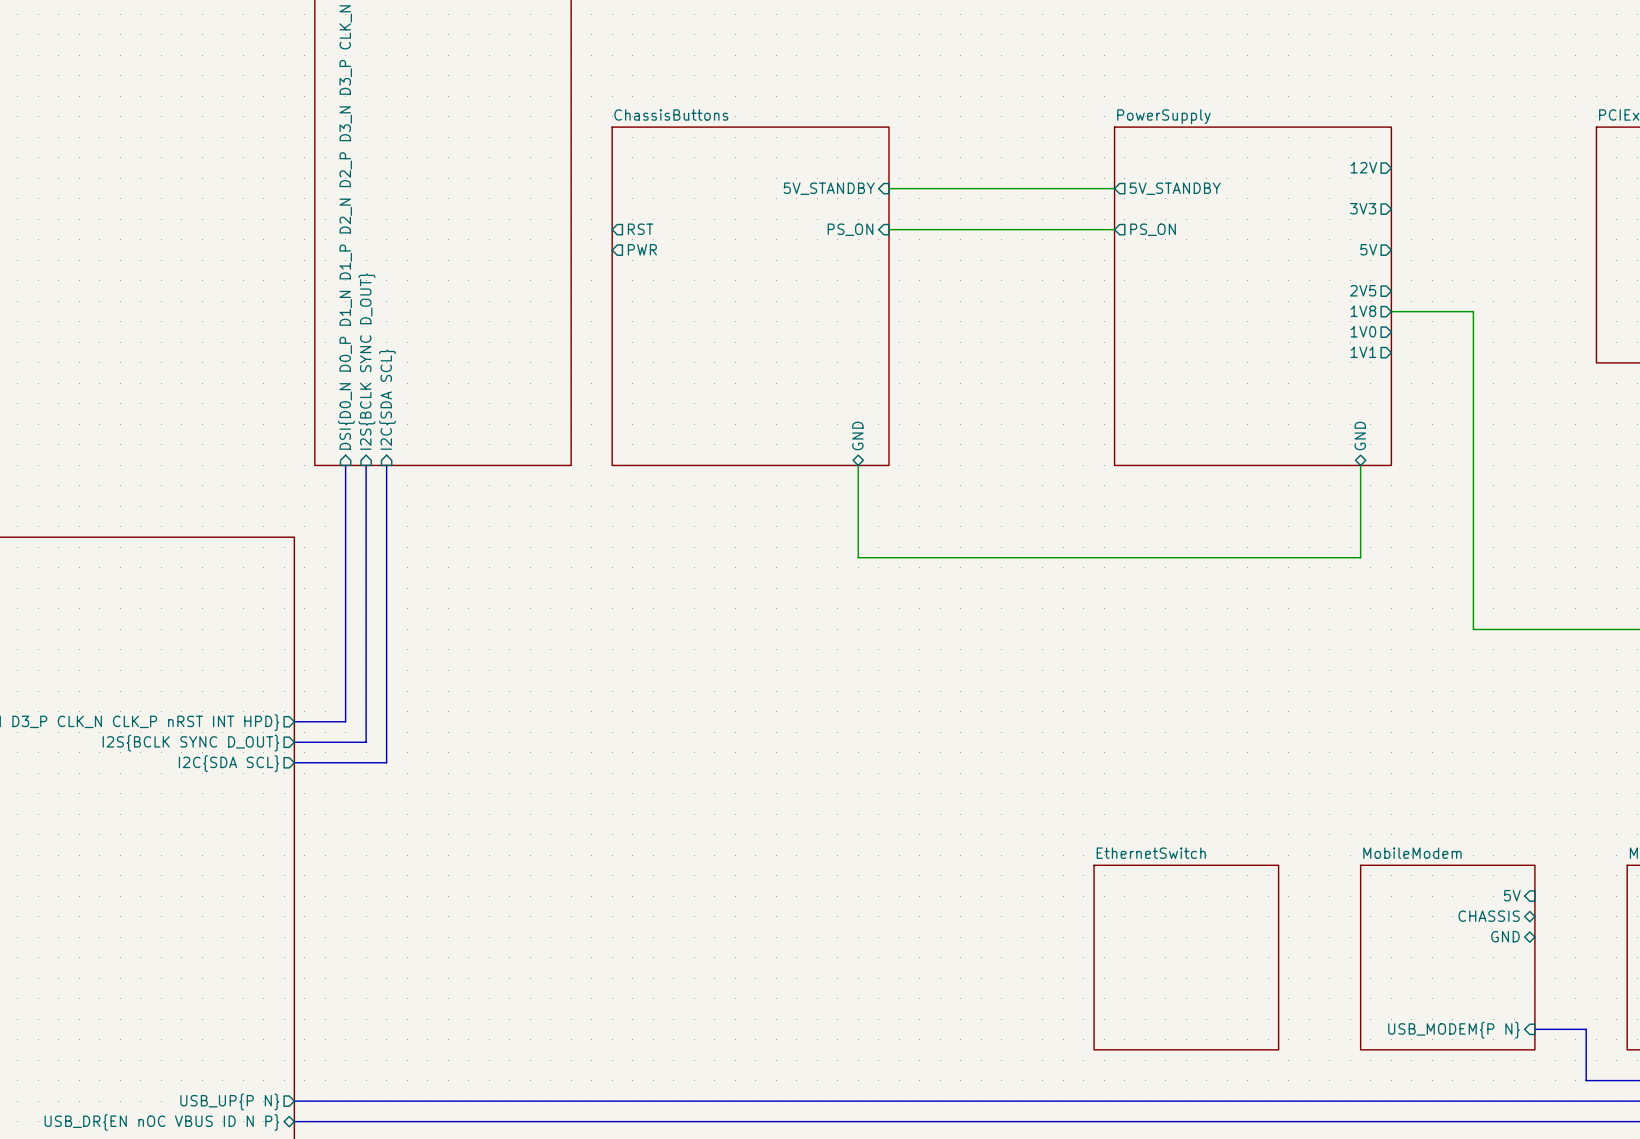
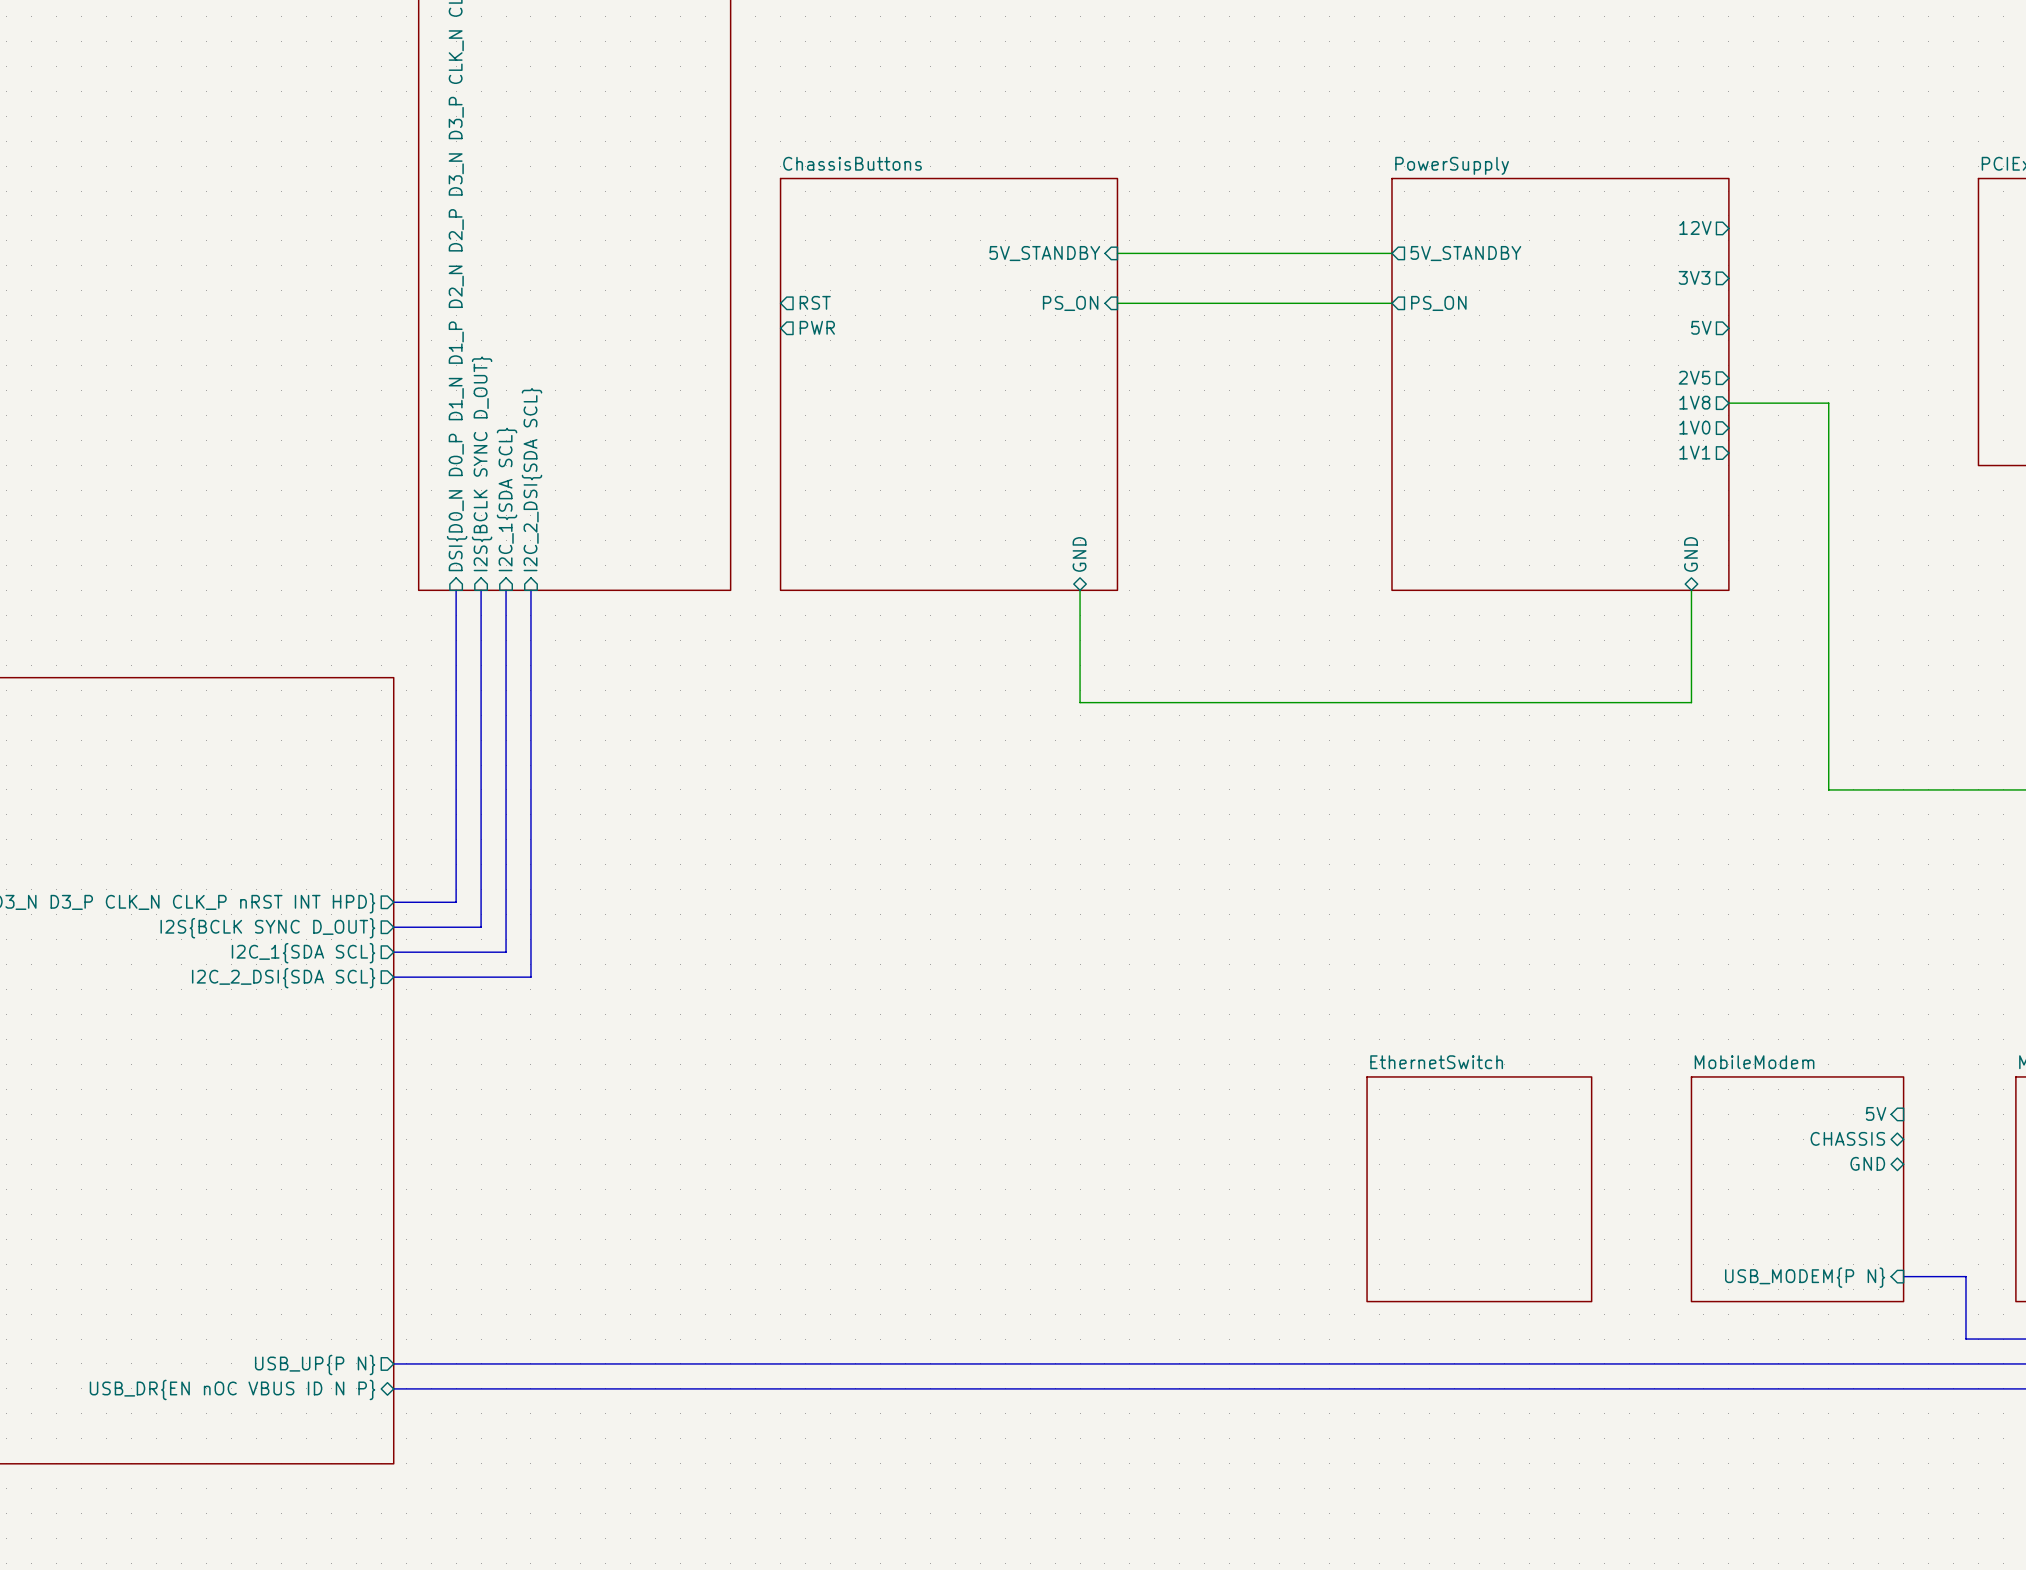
sheet pin: none -> I2C_2_DSI{SDA SCL} (532, 479)
sheet pin: I2C{SDA SCL} (387, 399) -> I2C_1{SDA SCL} (507, 499)
bus: none -> (530, 590) (530, 977) (393, 977)
sheet pin: I2C{SDA SCL} (229, 763) -> I2C_1{SDA SCL} (303, 953)
sheet pin: none -> I2C_2_DSI{SDA SCL} (283, 978)

